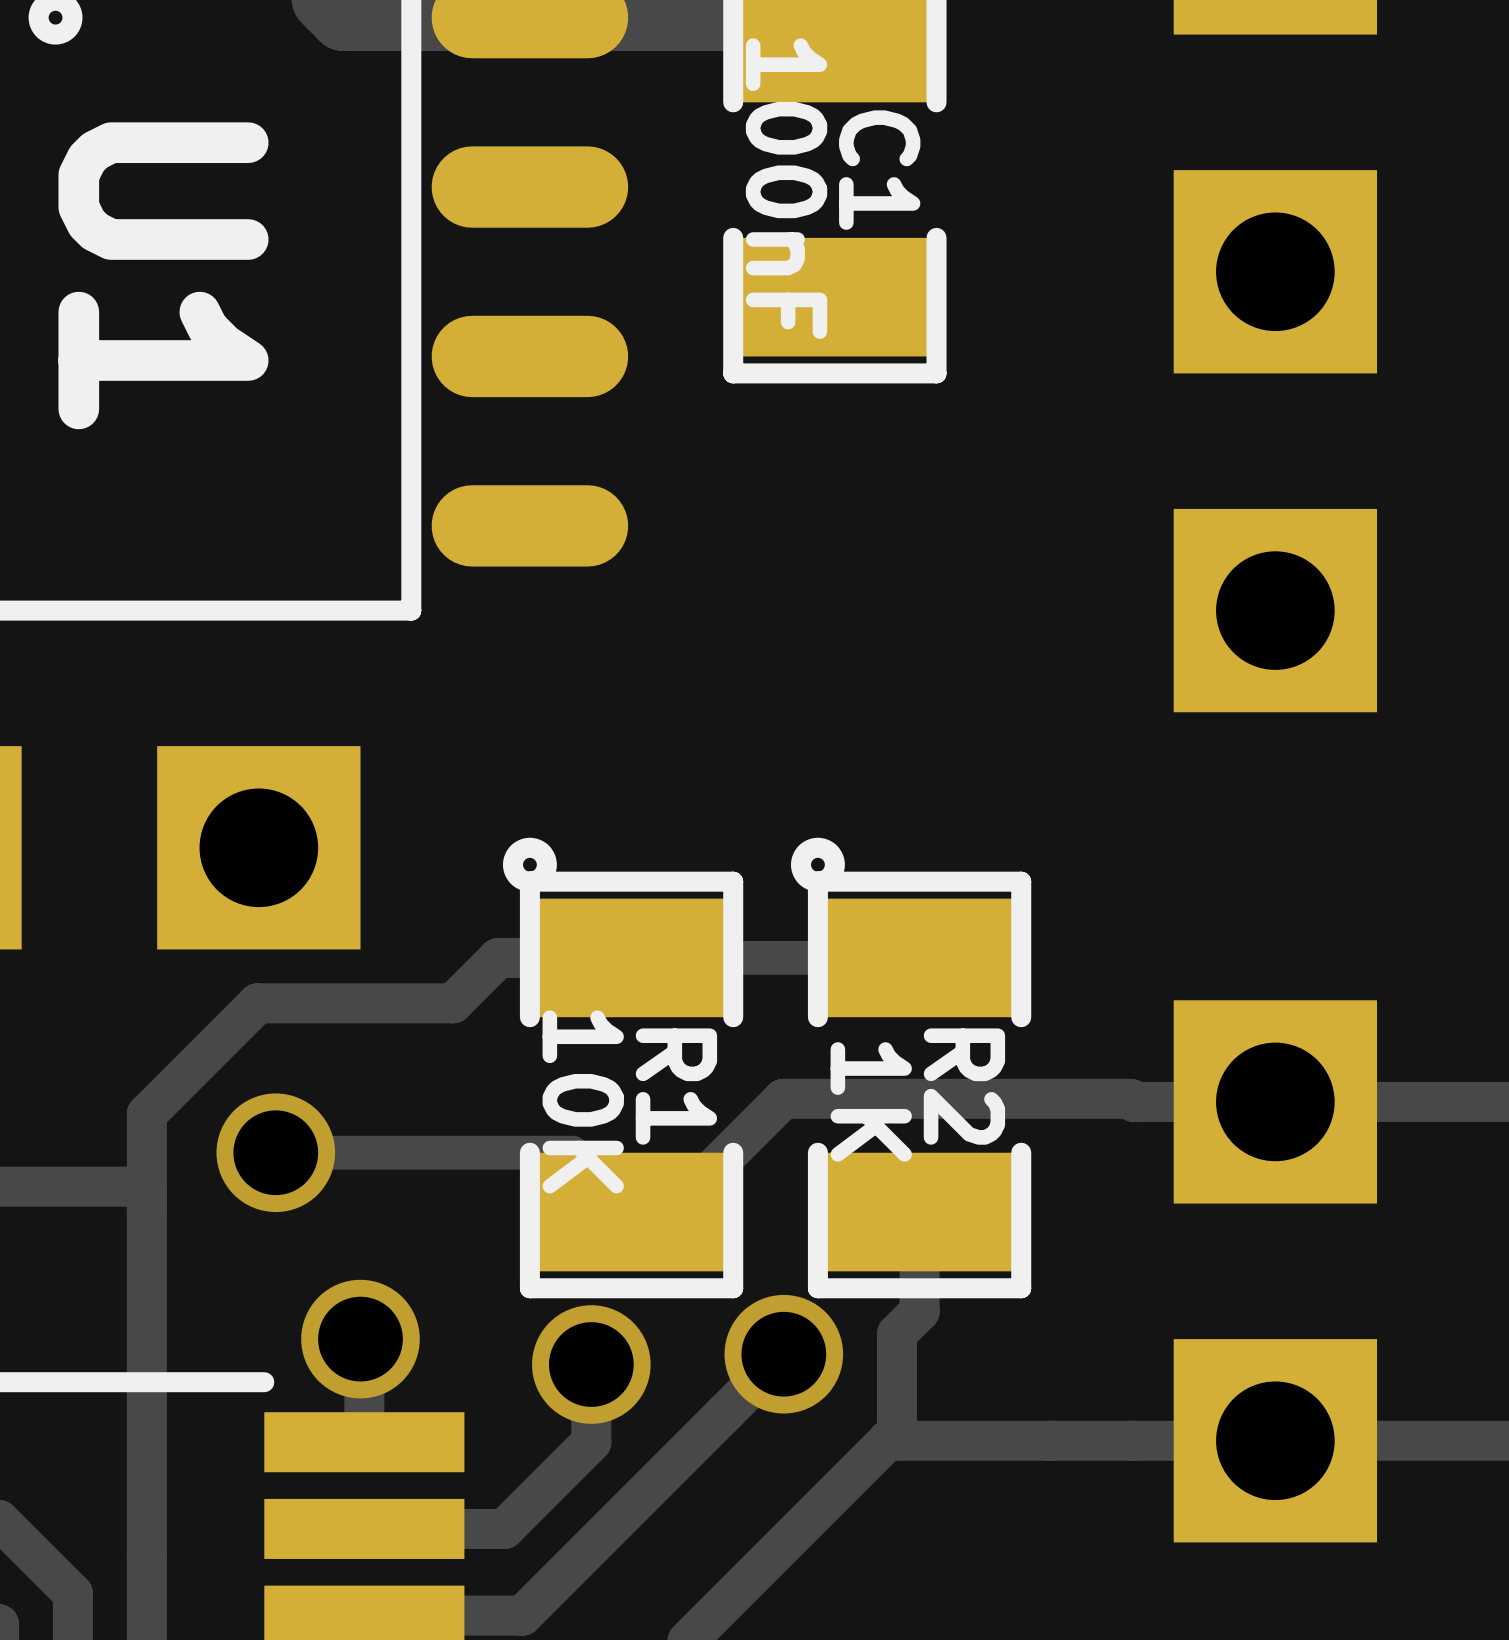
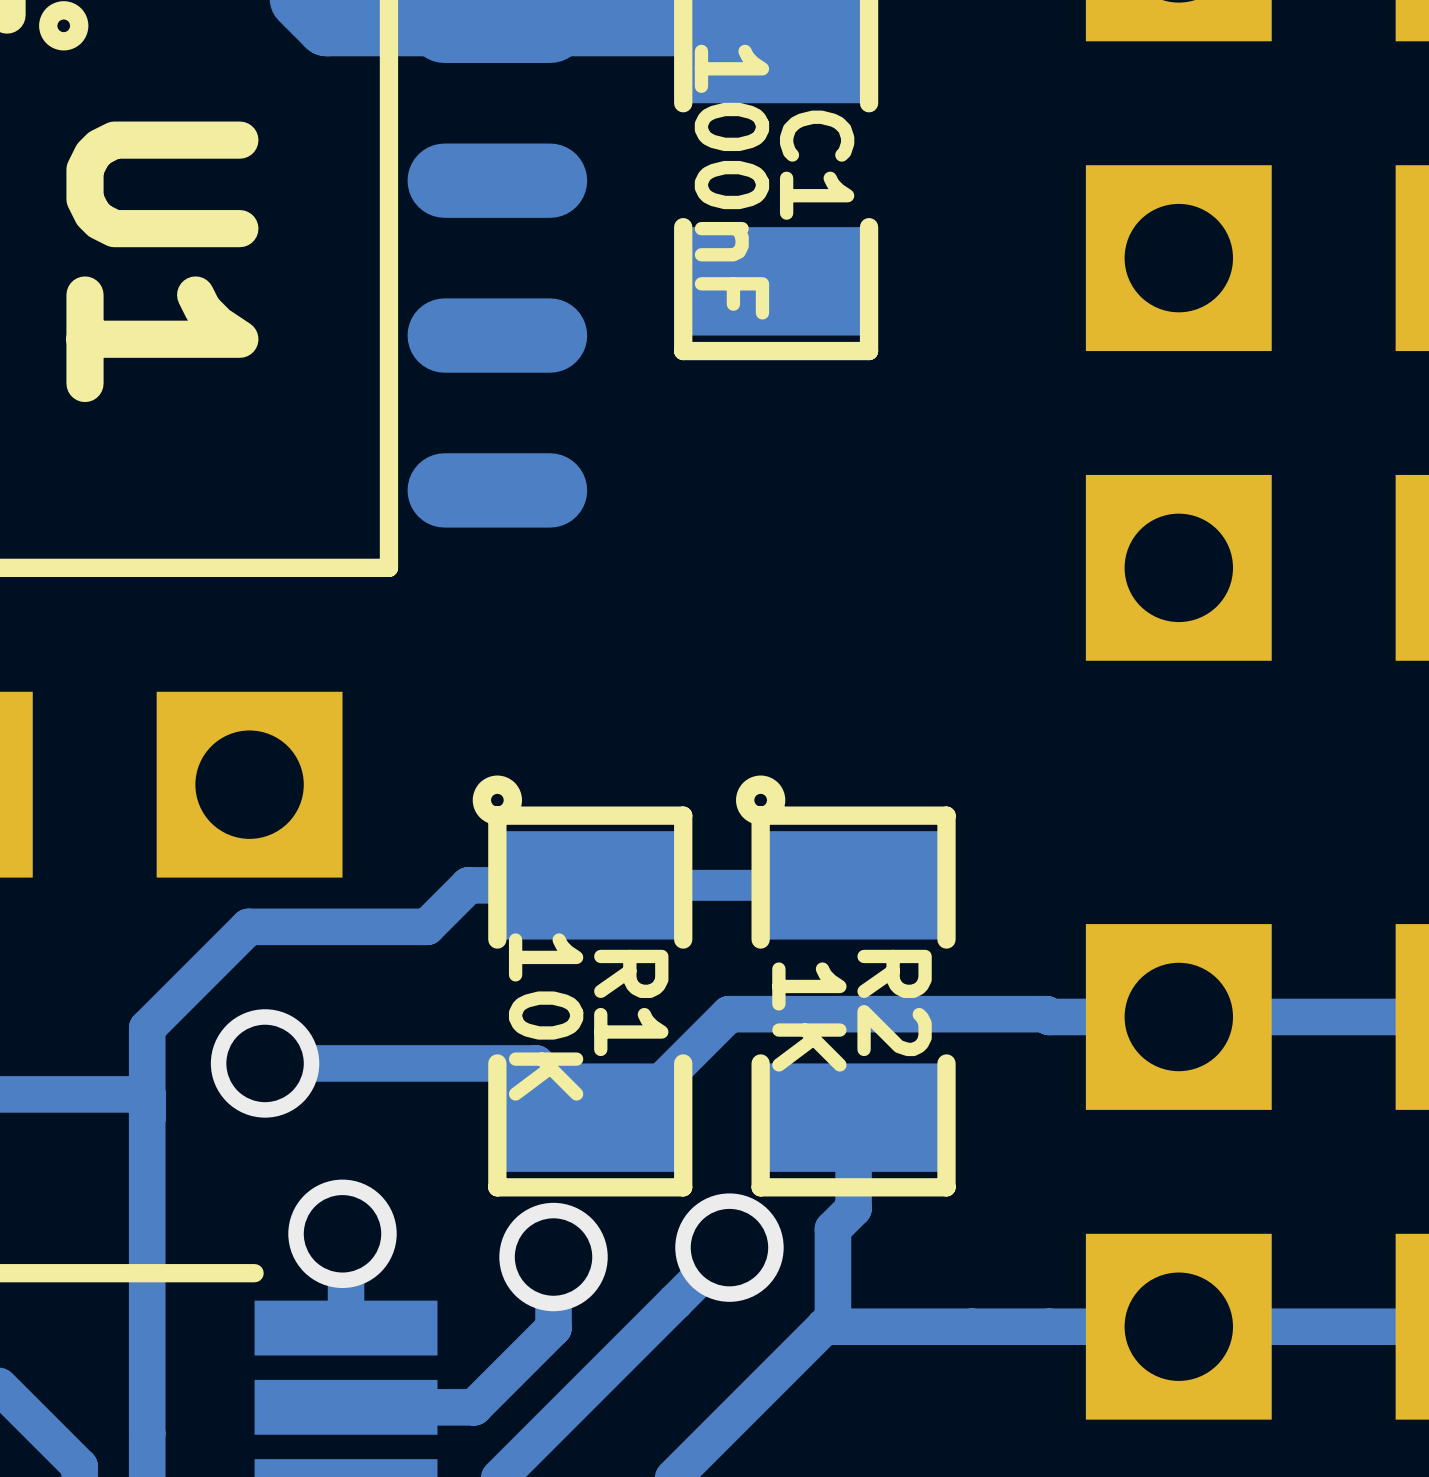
track width: thin (275, 1152) (572, 1152) (588, 1168) -> thick (265, 1063) (536, 1063) (550, 1078)

